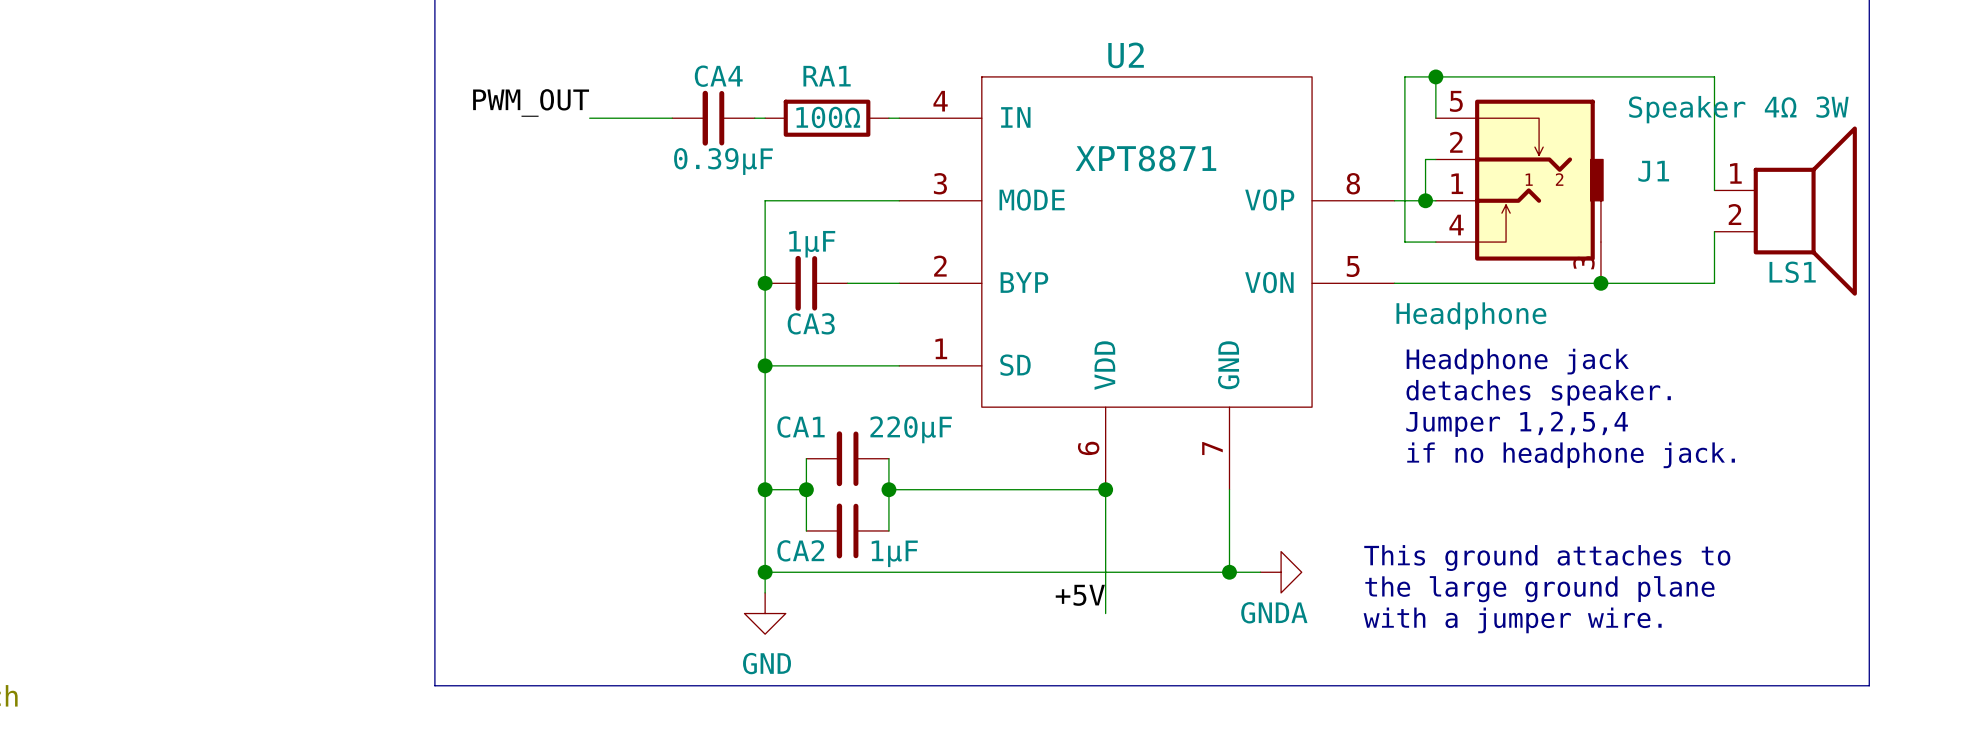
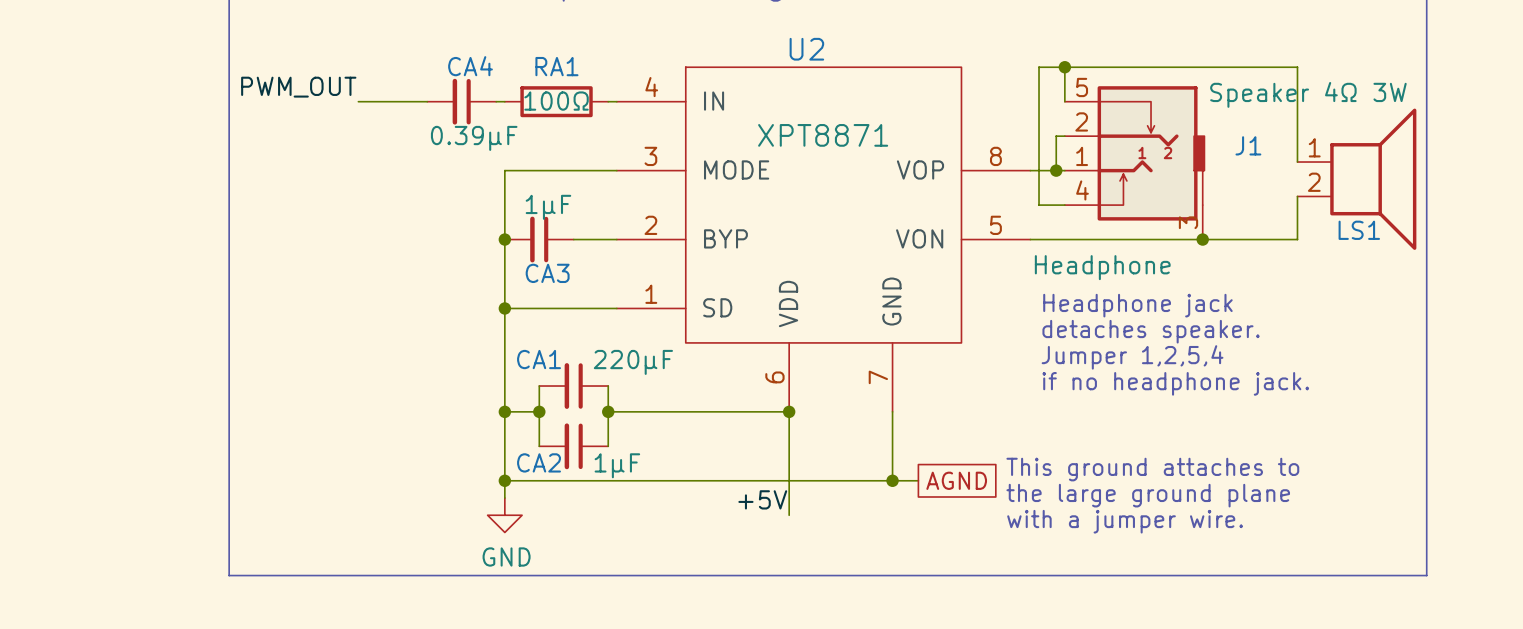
power symbol: GNDA (1281, 572) -> none
global label: none -> AGND (956, 480)

